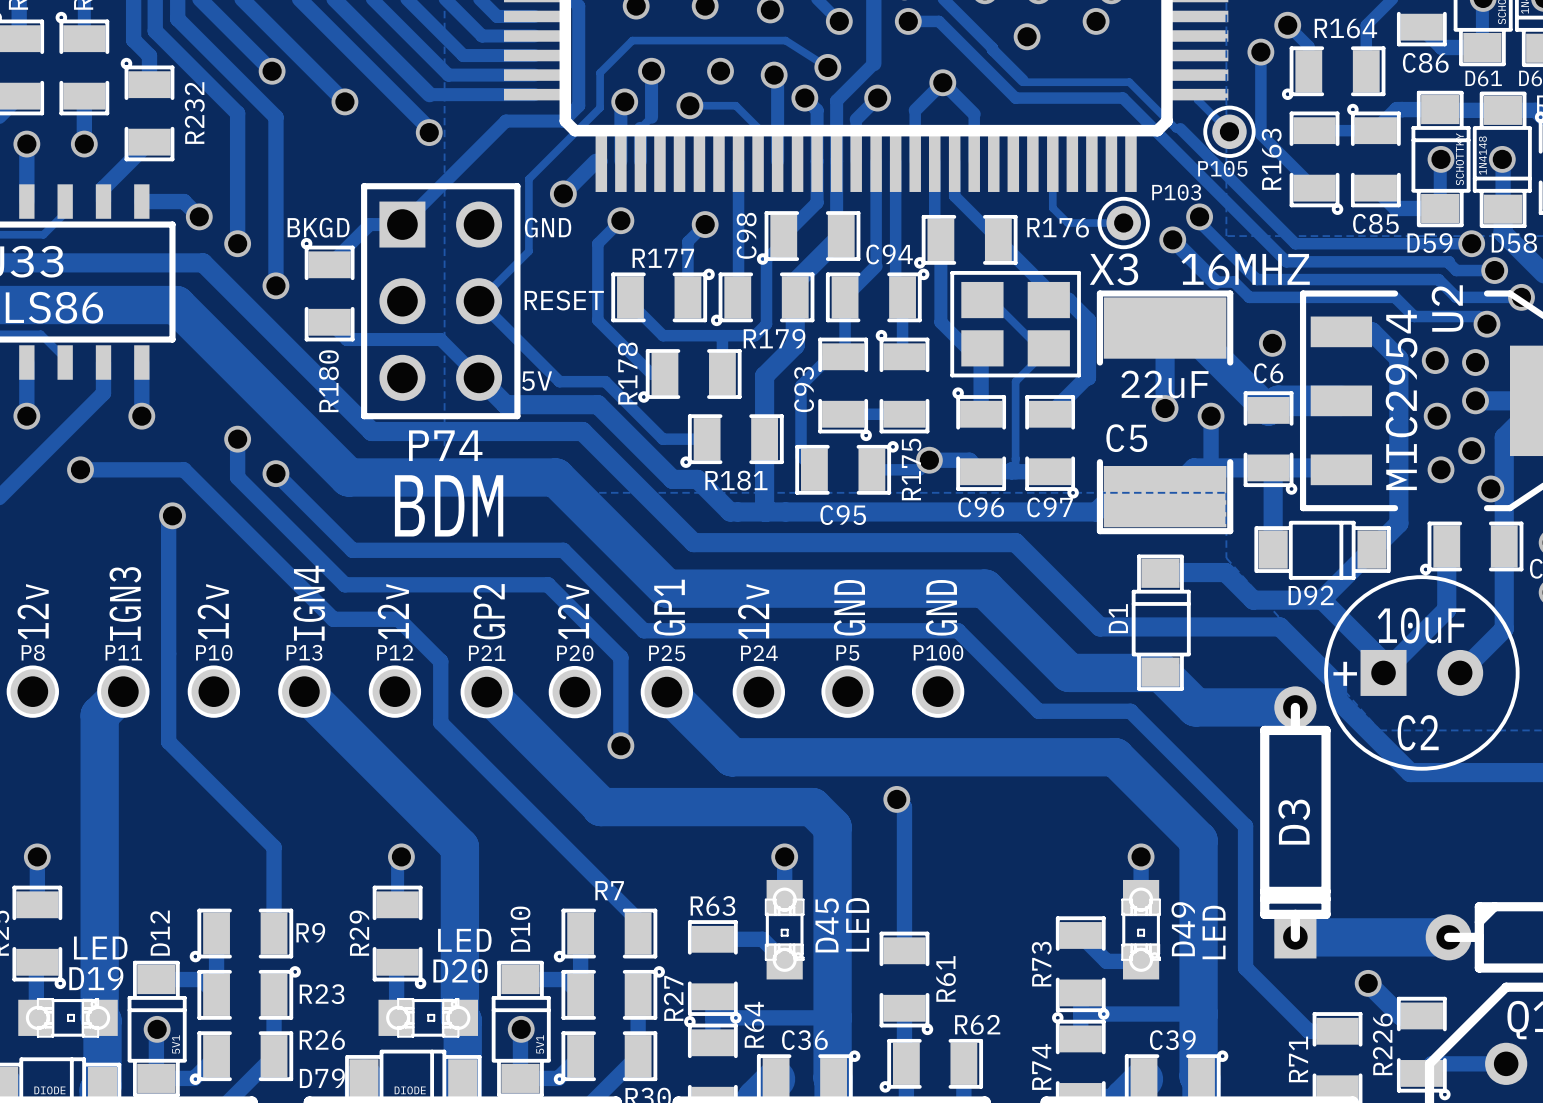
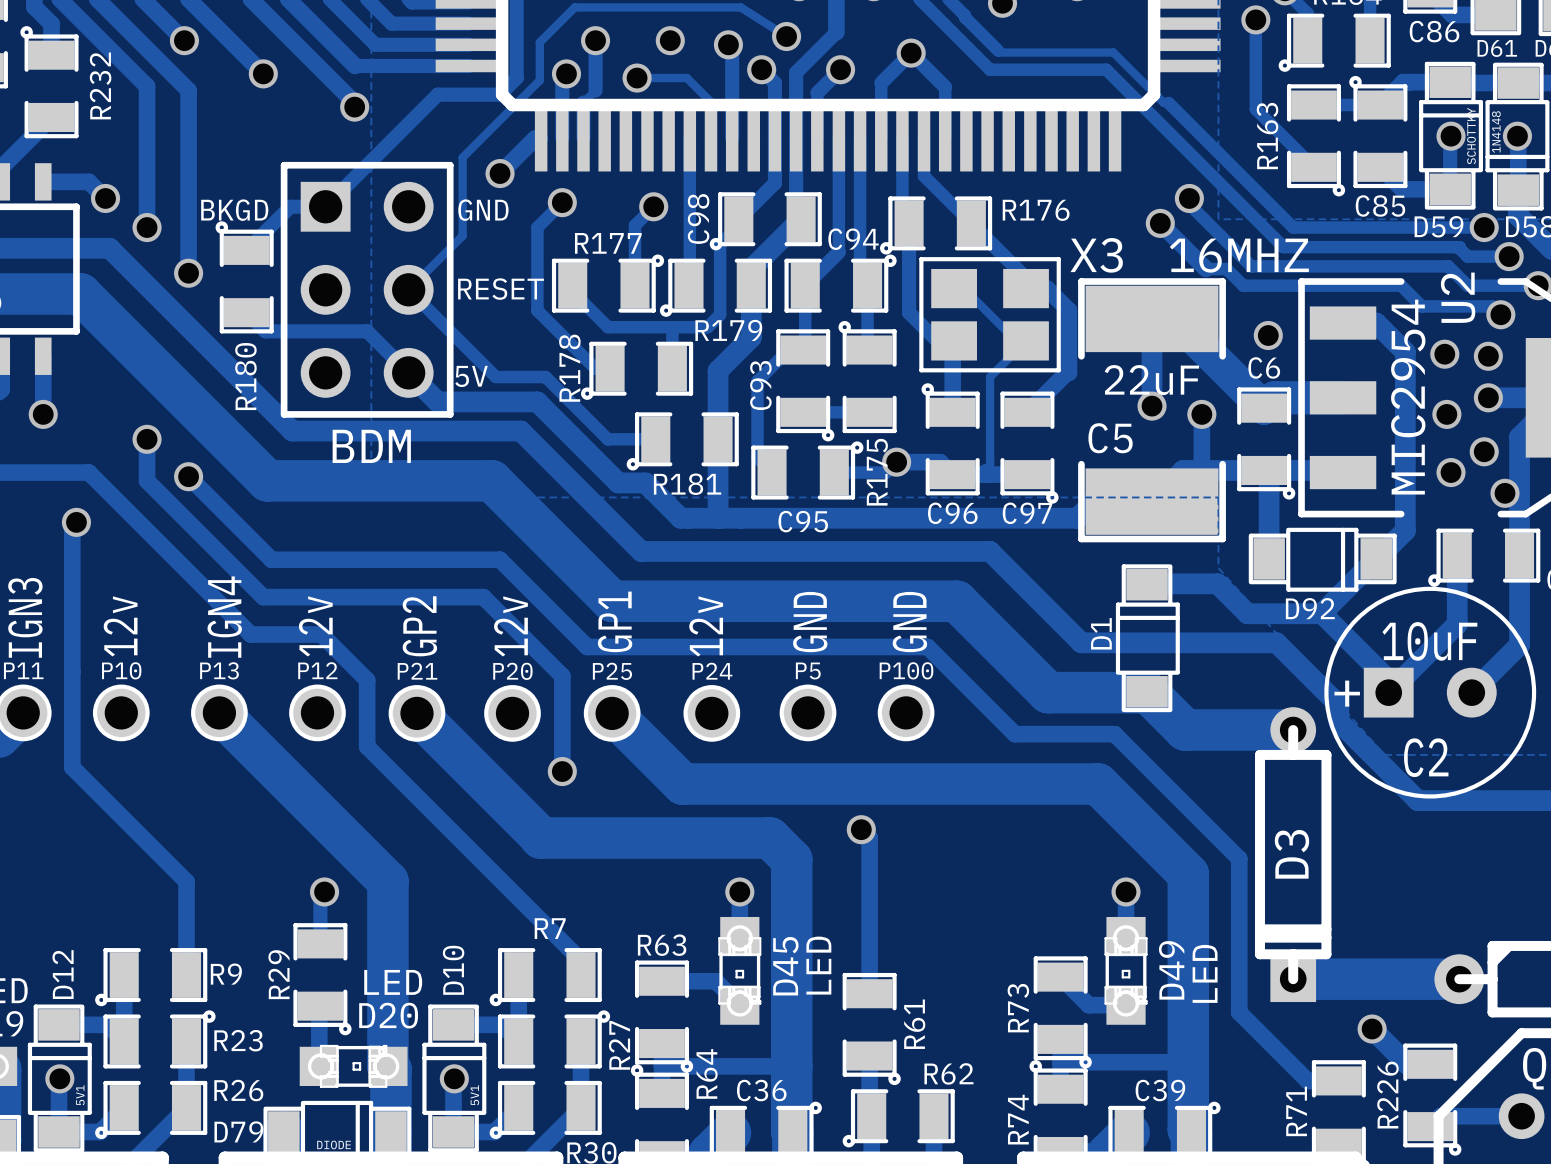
track: (1197, 94) (1197, 100) (1229, 131) -> none
P105: (1229, 131) -> none
track: (1052, 161) (1052, 208) (1067, 223) (1123, 223) -> none
P103: (1123, 223) -> none
P74 name: P74 (445, 445) -> BDM (371, 446)
text: BDM (449, 505) -> none

